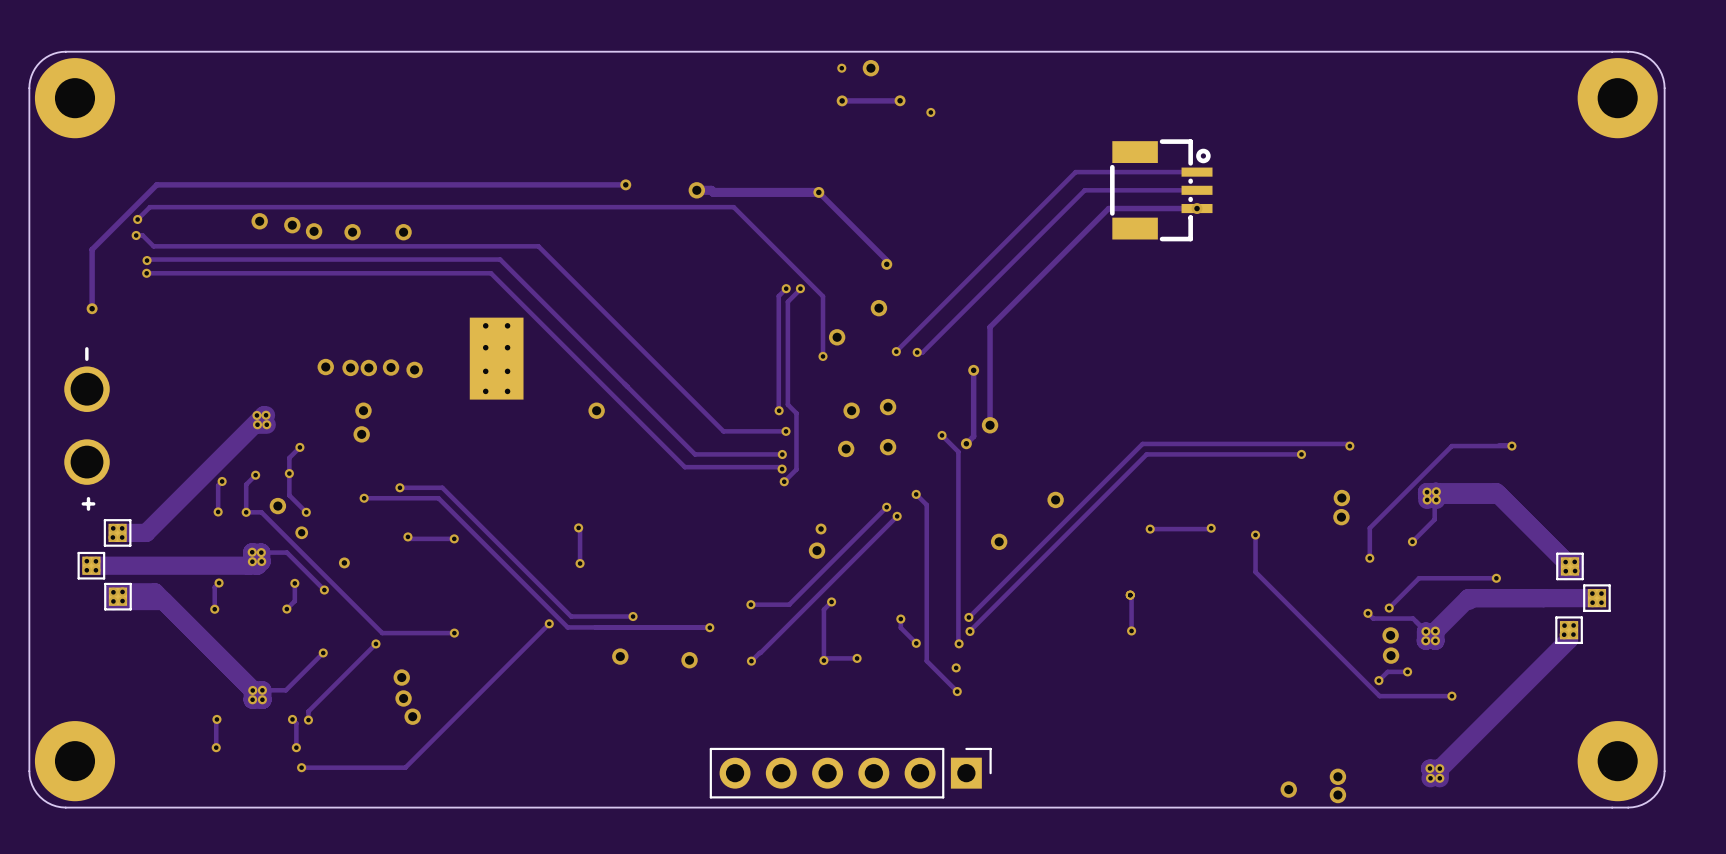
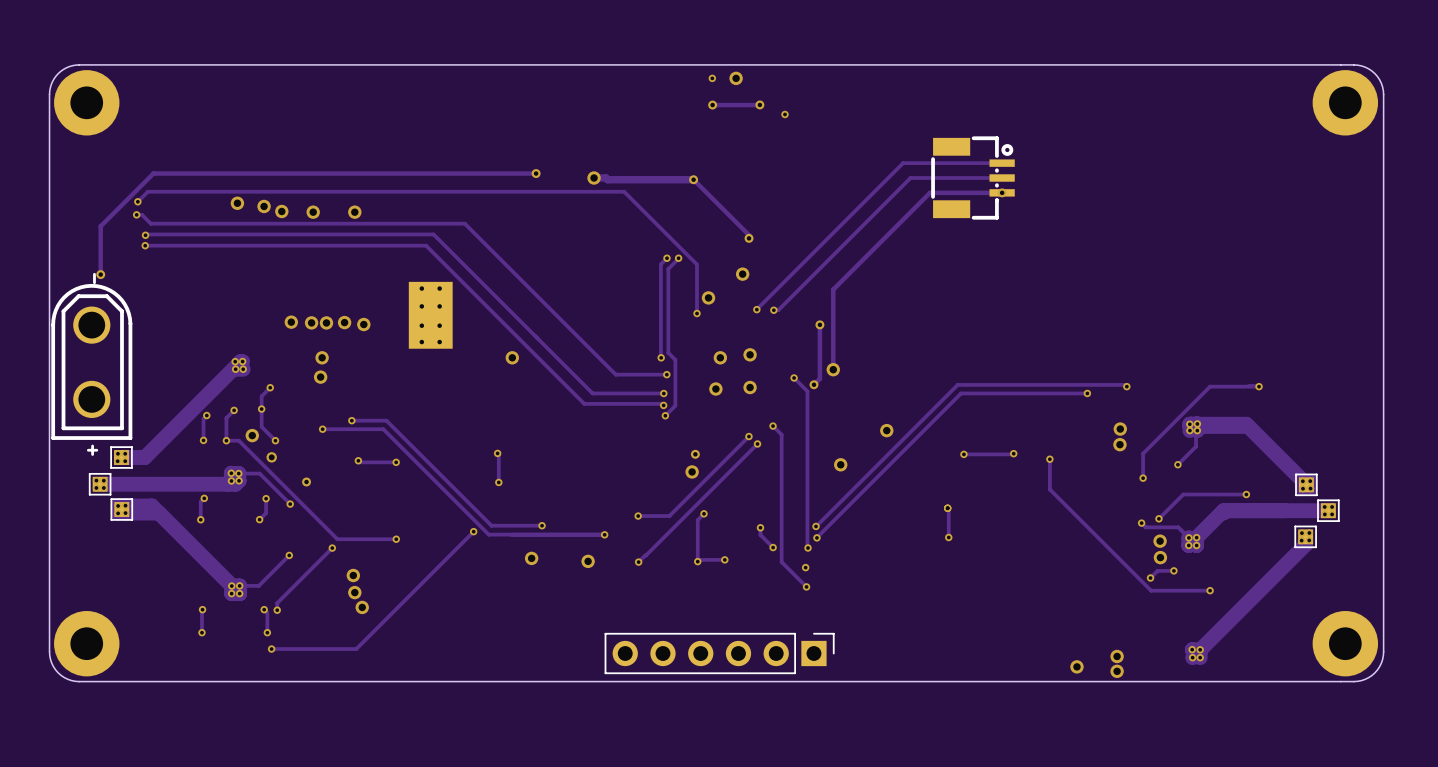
part footprint: [64, 366, 110, 485] -> [51, 283, 133, 440]

